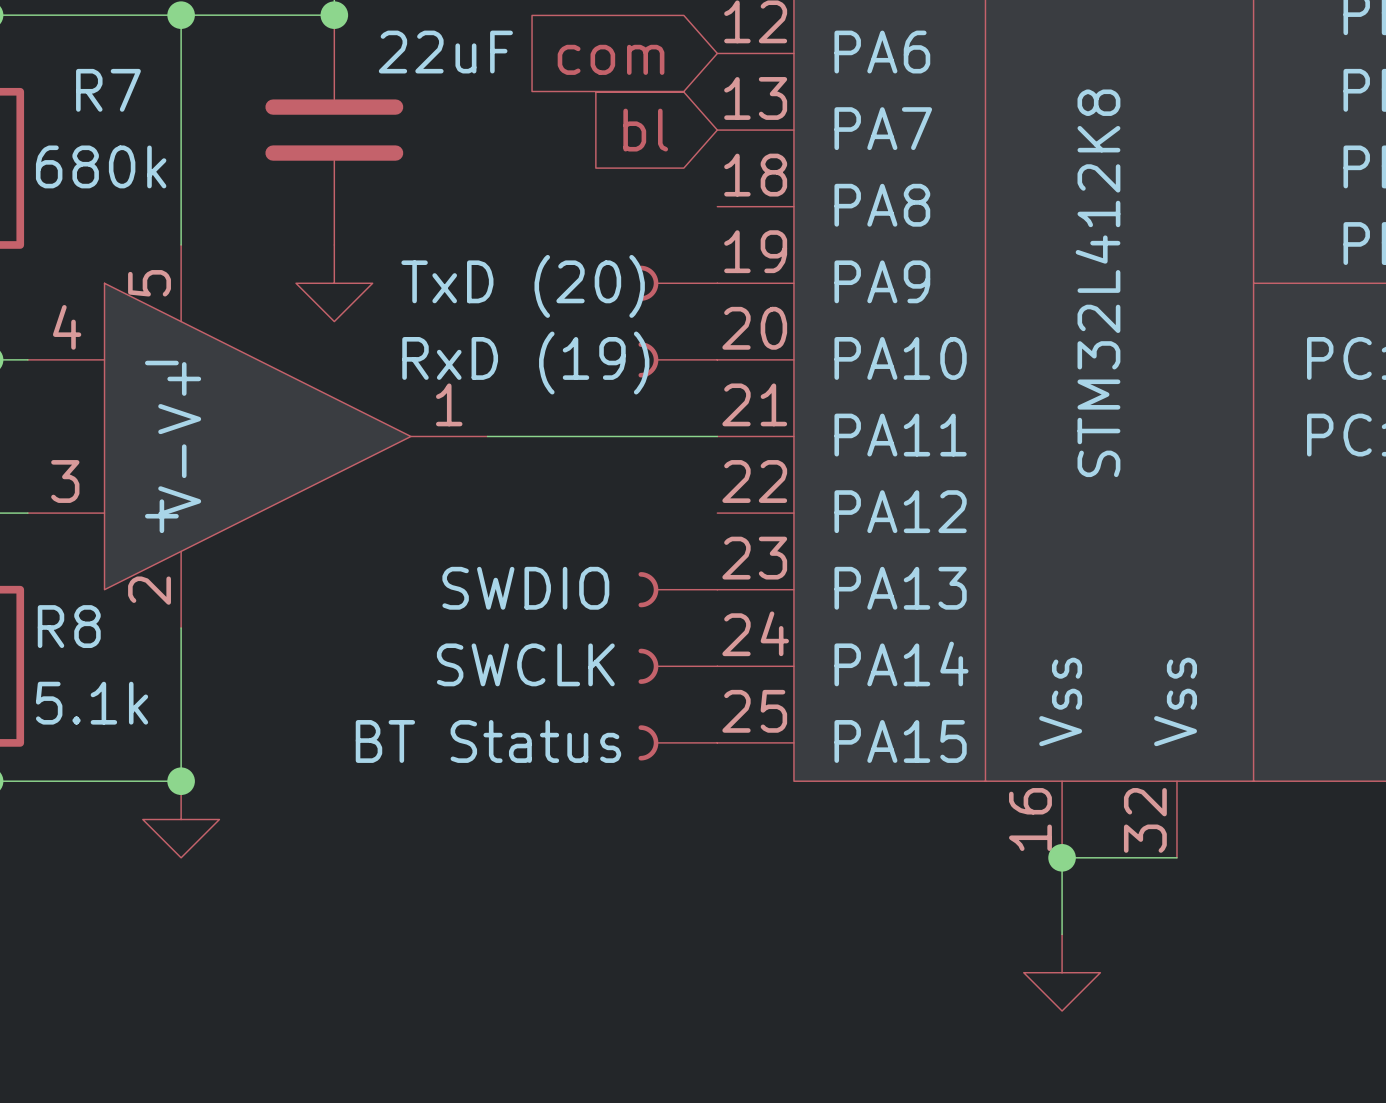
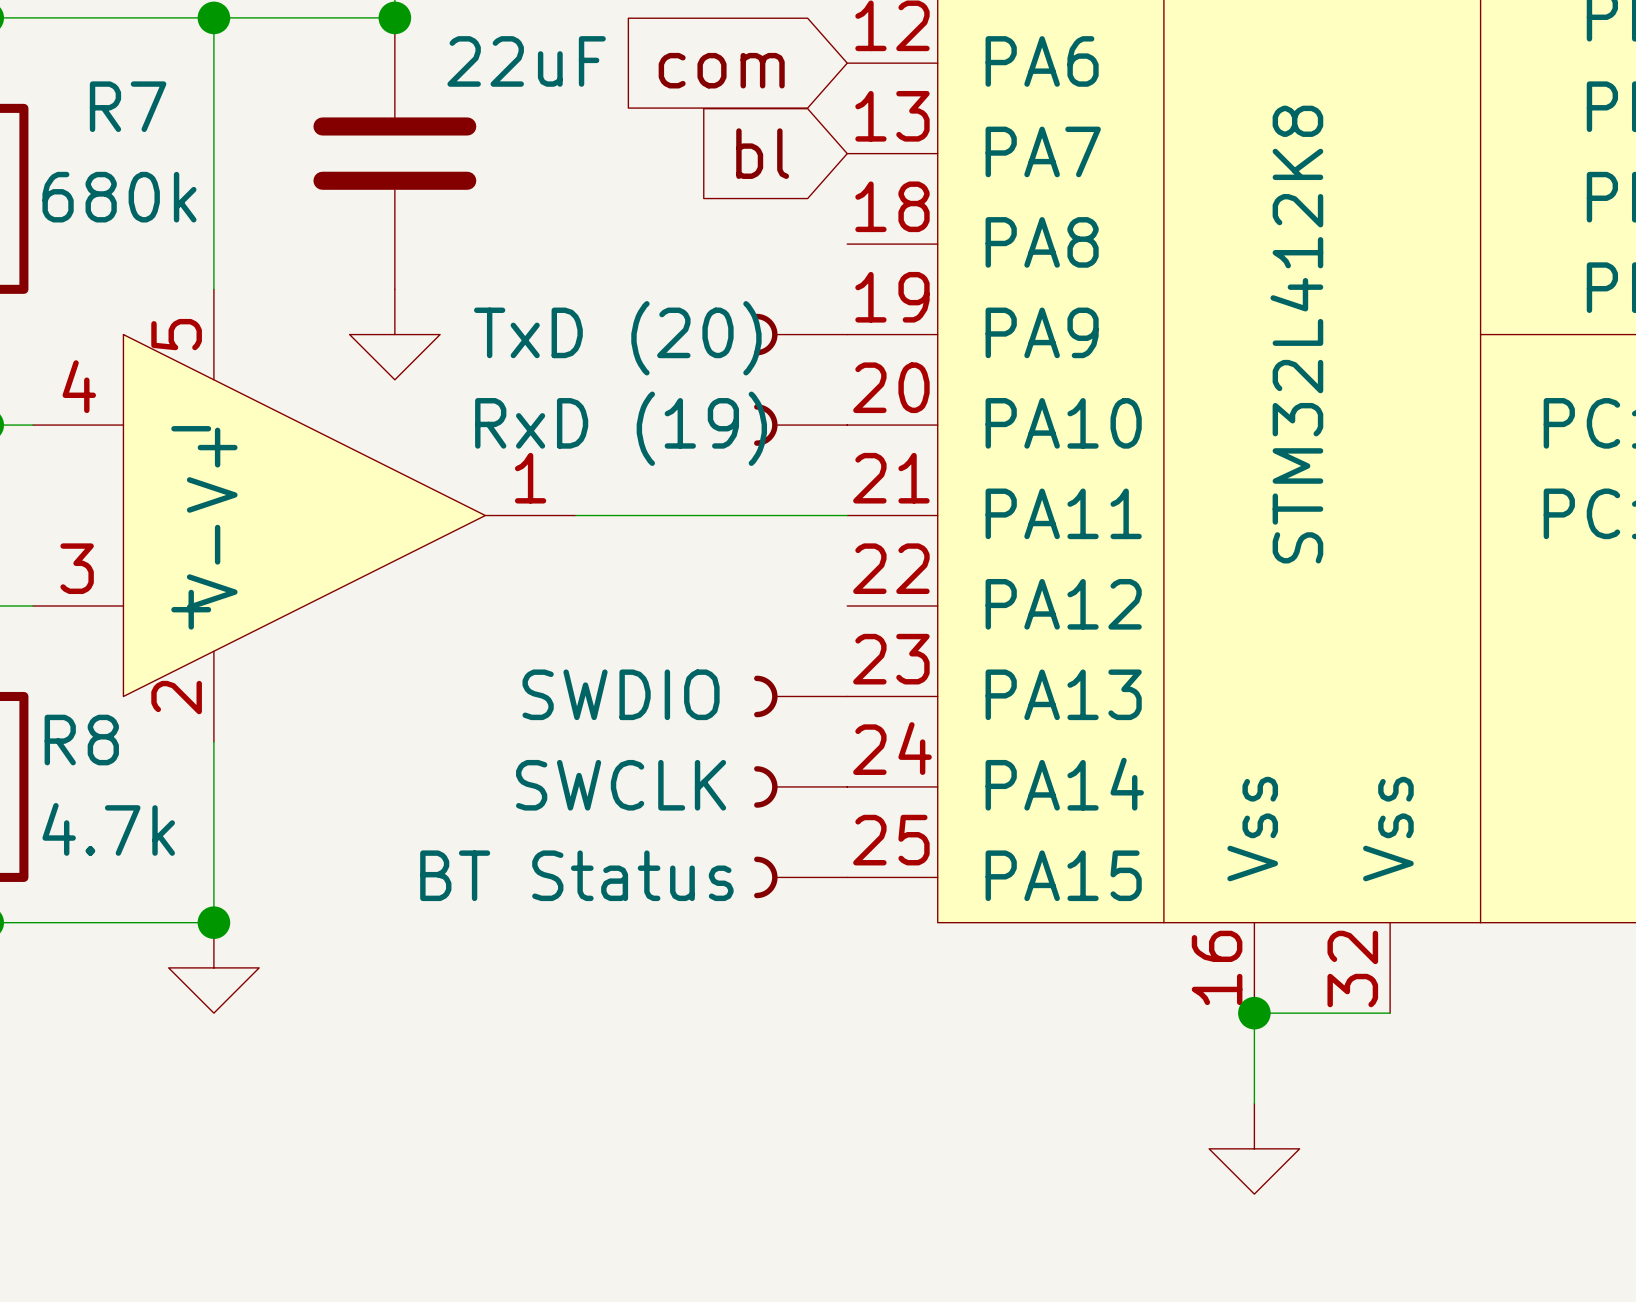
R8 value: 5.1k (92, 703) -> 4.7k (108, 829)

